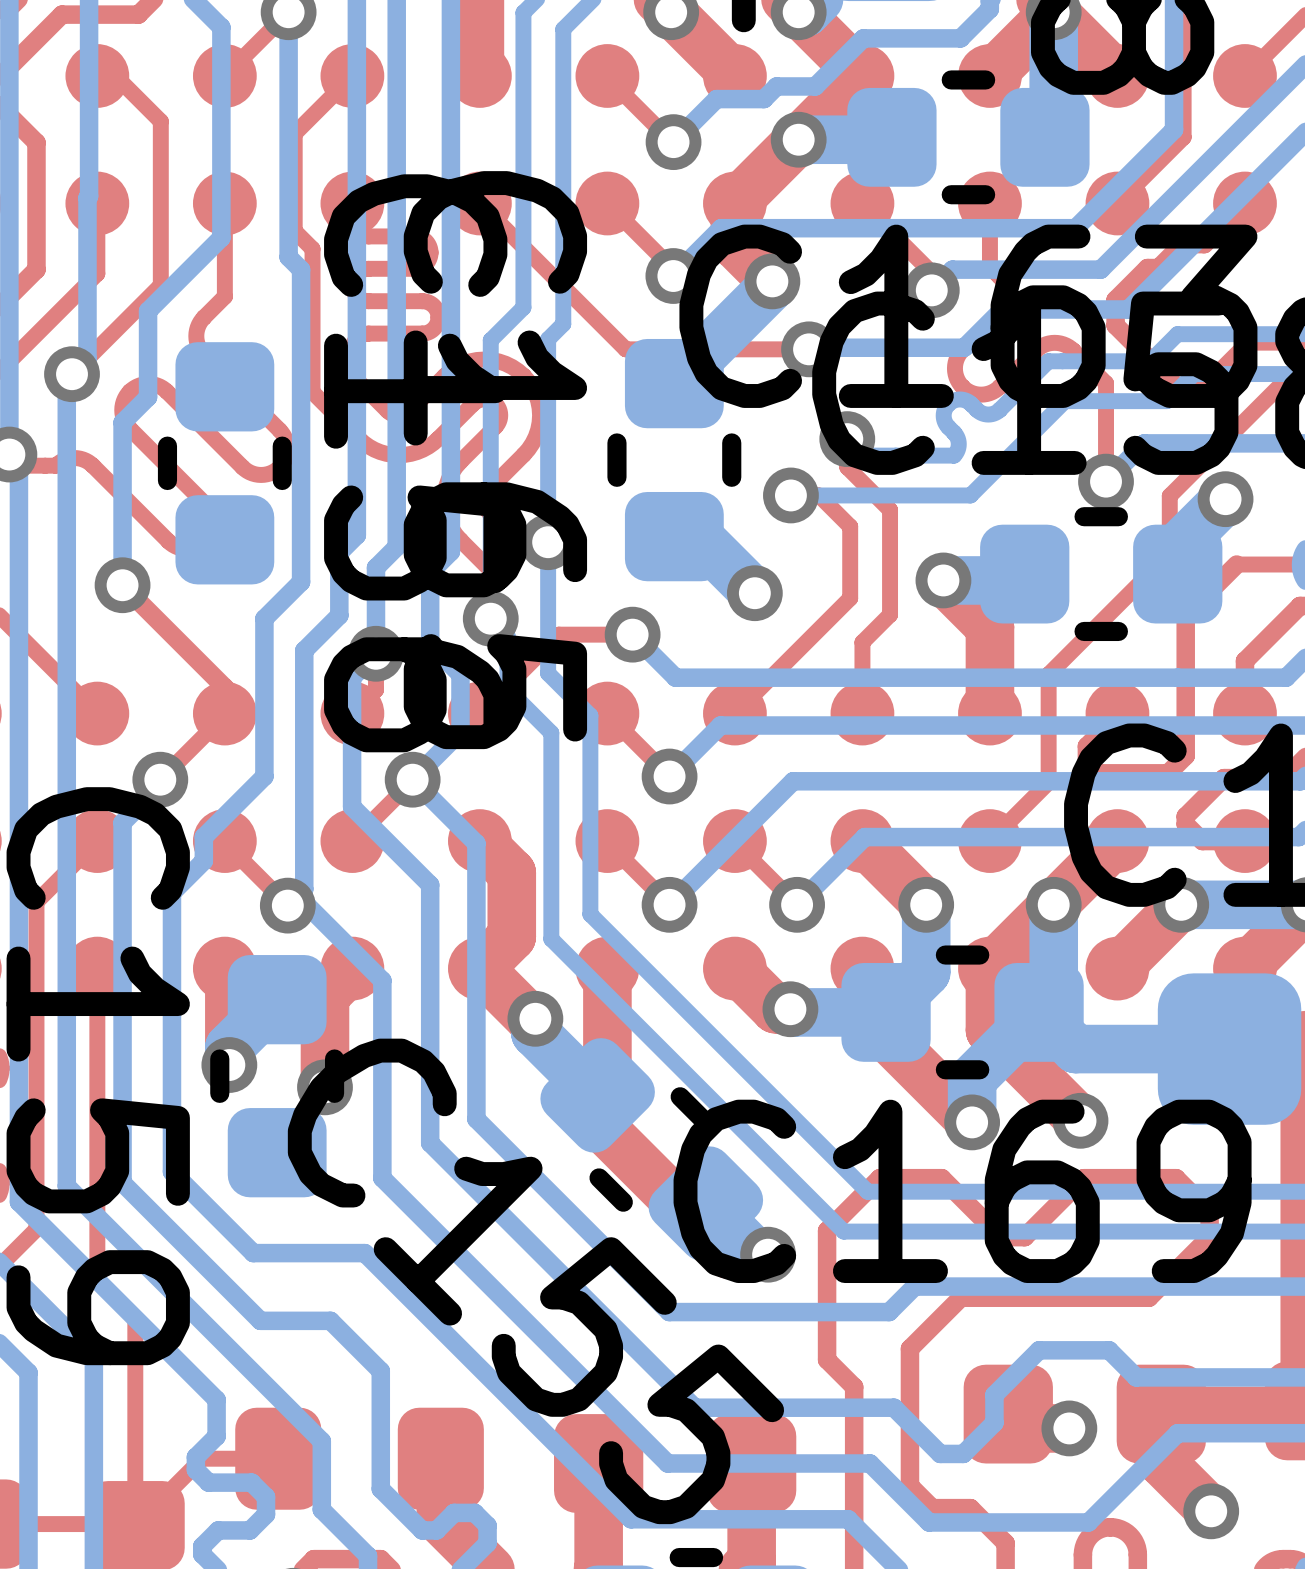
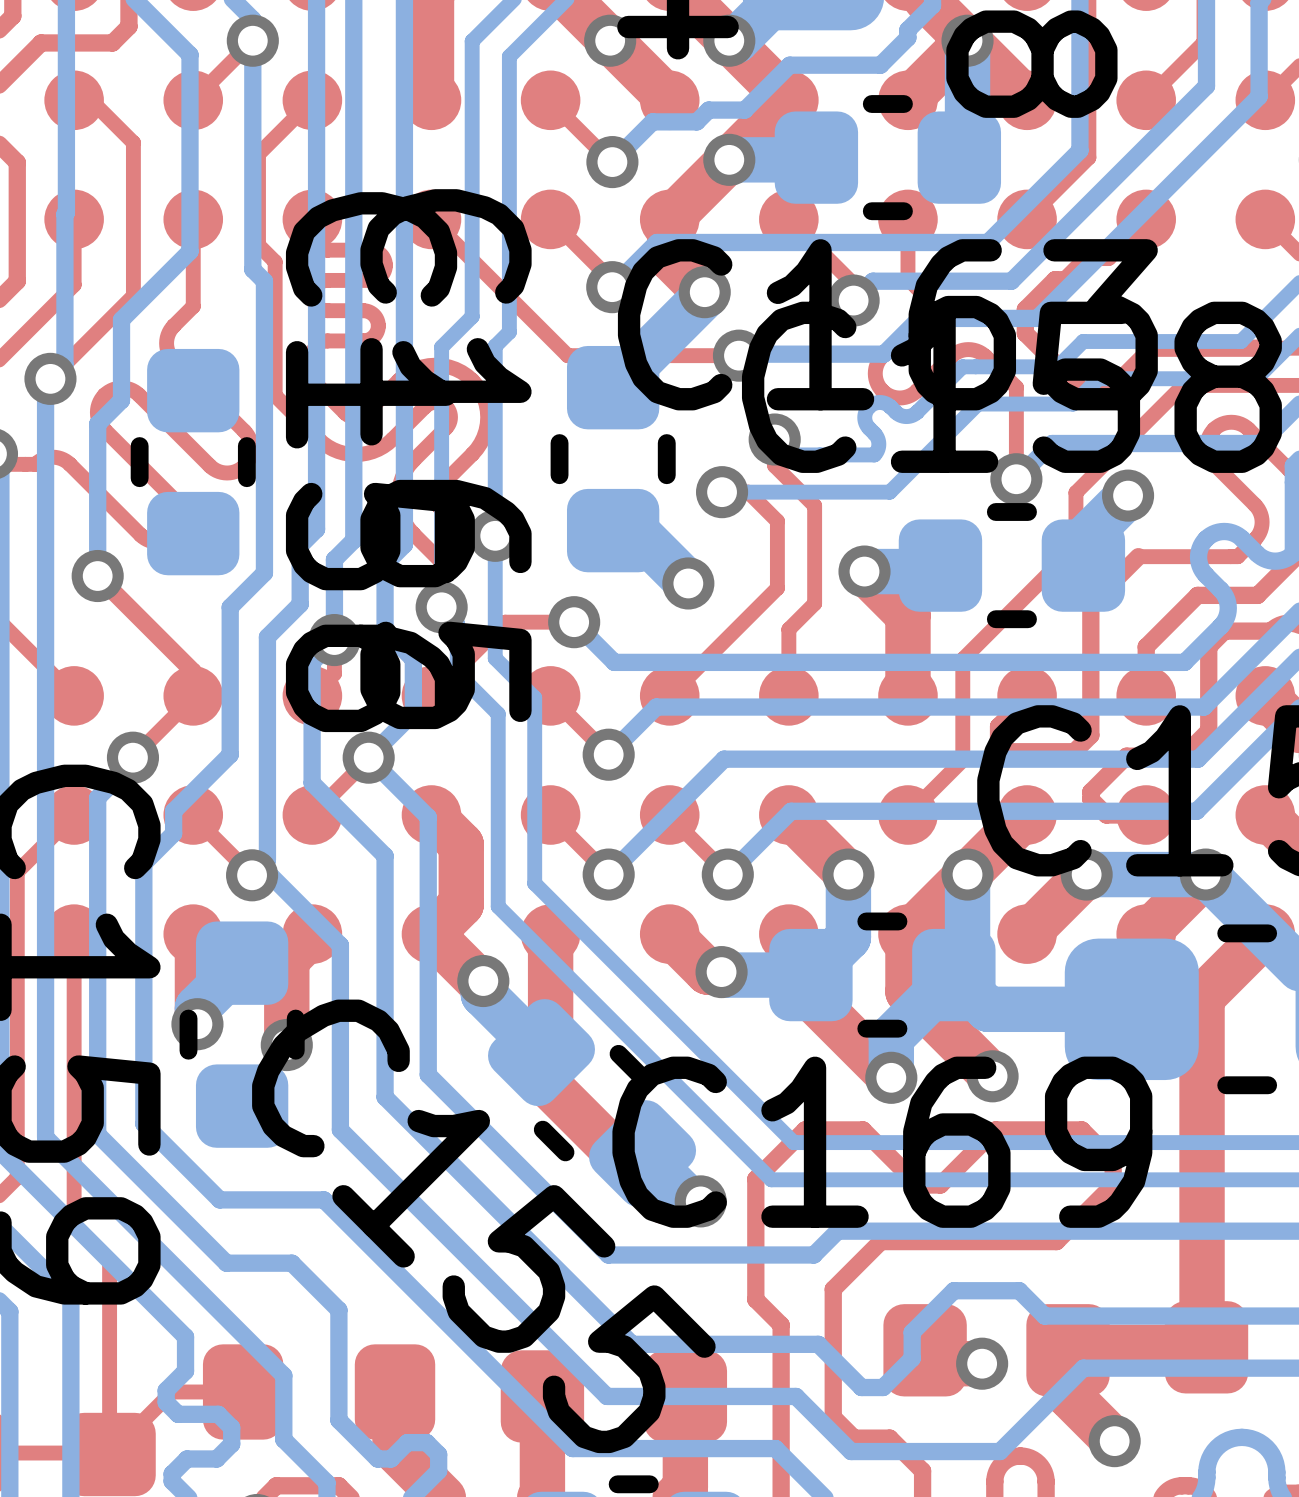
top track: (406, 301) (430, 303) (436, 309) (438, 317) (436, 325) (430, 331) (406, 333) -> (363, 310) (373, 315) (378, 325) (373, 336) (363, 340)

